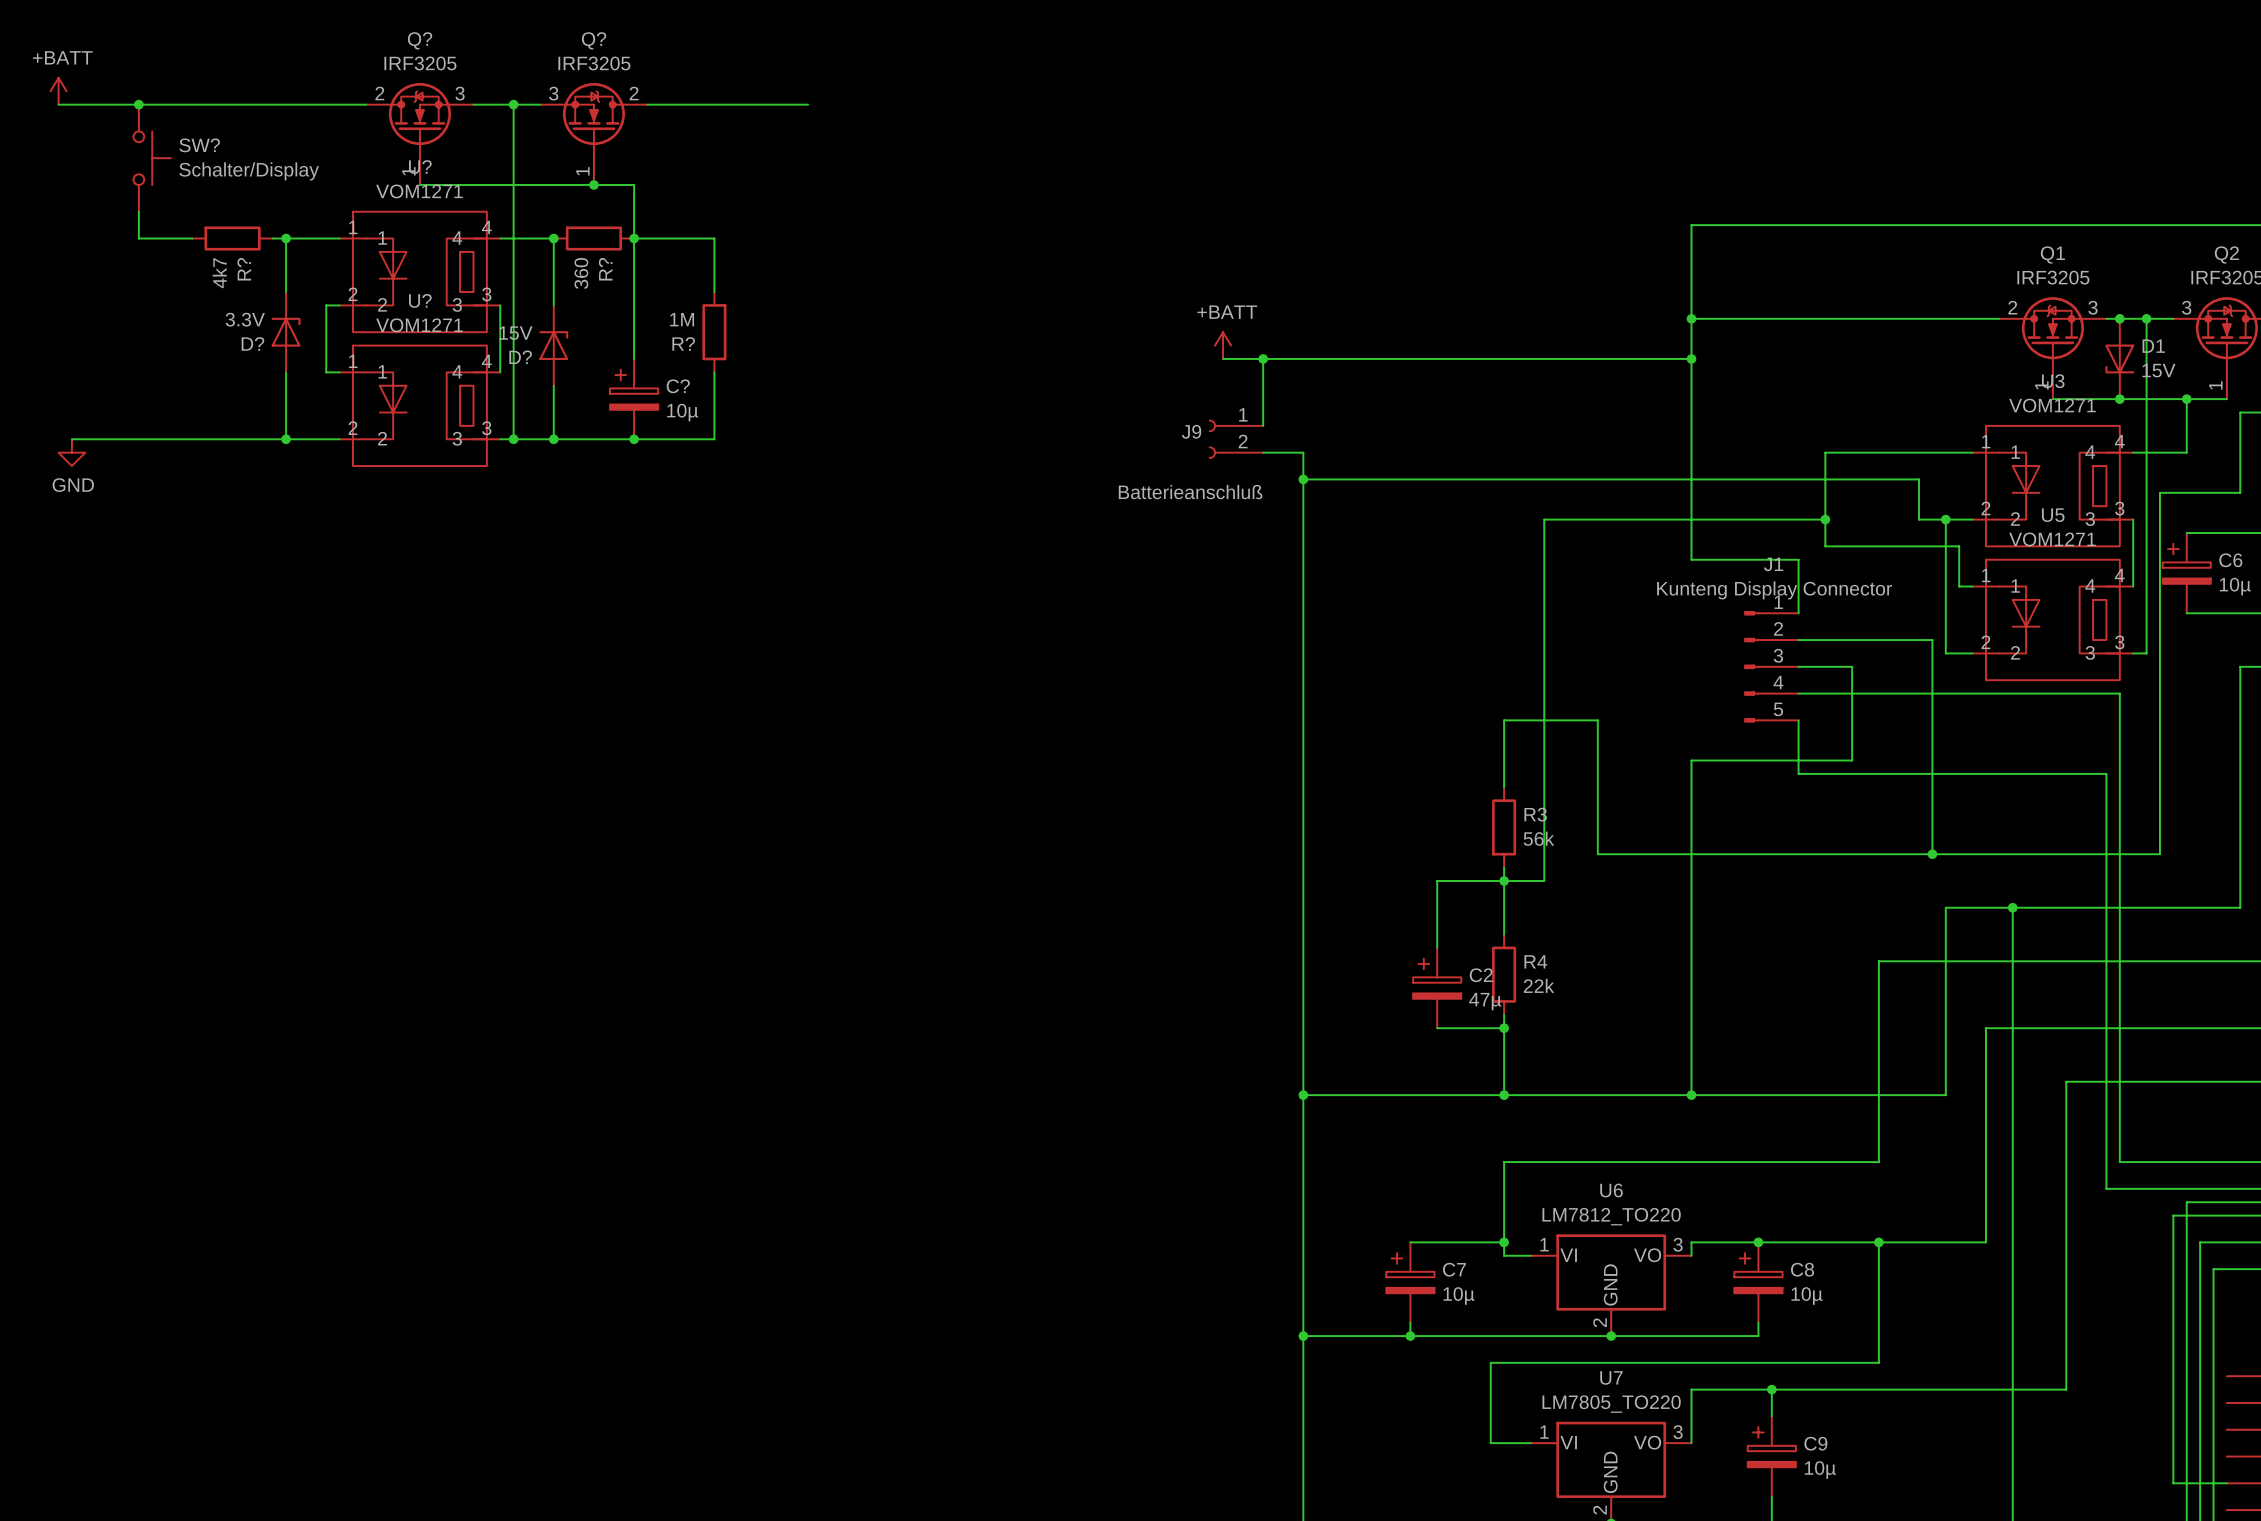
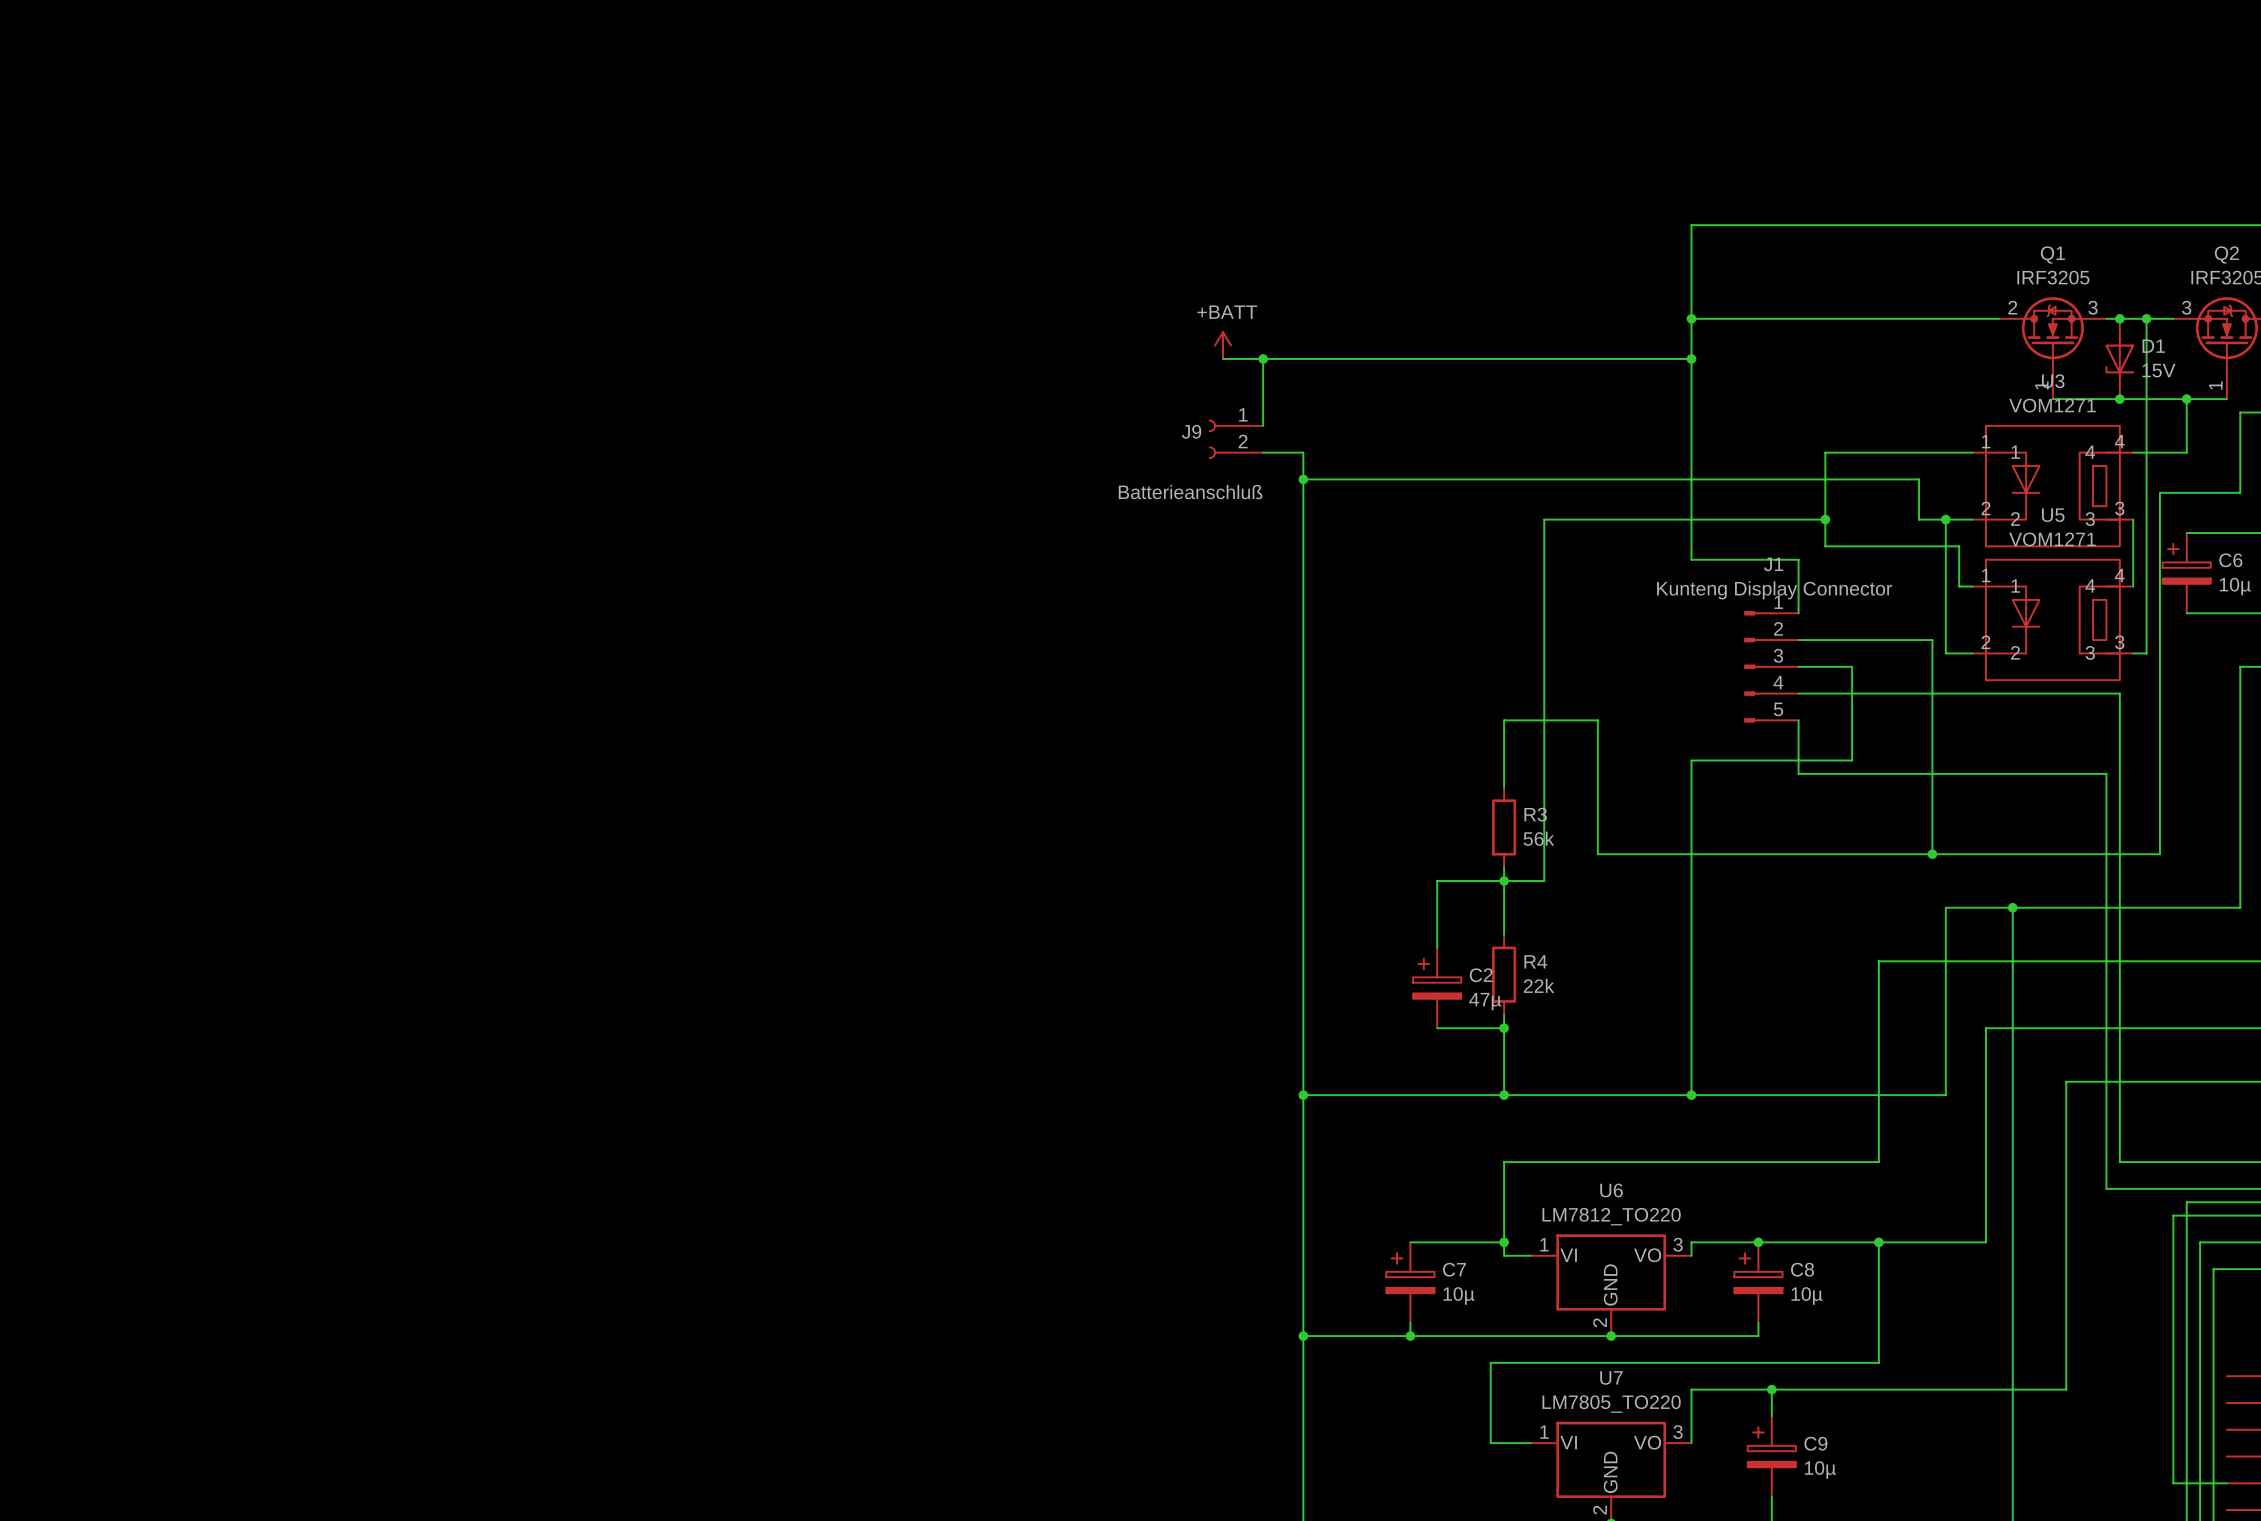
power symbol: +BATT (58, 91) -> none
wire: (58, 104) (366, 104) -> none
junction: (138, 104) -> none
wire: (473, 104) (540, 104) -> none
wire: (513, 104) (513, 439) -> none
junction: (513, 104) -> none
wire: (647, 104) (808, 104) -> none
Q?: IRF3205 (419, 133) -> none
Q?: IRF3205 (593, 133) -> none
SW?: Schalter/Display (152, 158) -> none
wire: (419, 184) (634, 184) (634, 358) -> none
junction: (593, 184) -> none
wire: (138, 211) (138, 238) (192, 238) -> none
R?: 4k7 (232, 238) -> none
wire: (272, 238) (339, 238) -> none
wire: (286, 238) (286, 292) -> none
junction: (286, 238) -> none
wire: (500, 238) (553, 238) (553, 305) -> none
junction: (553, 238) -> none
R?: 360 (593, 238) -> none
wire: (634, 238) (714, 238) (714, 292) -> none
junction: (634, 238) -> none
U?: VOM1271 (419, 271) -> none
wire: (339, 305) (326, 305) (326, 372) (339, 372) -> none
wire: (500, 305) (500, 372) -> none
D?: 3.3V (286, 332) -> none
R?: 1M (714, 332) -> none
D?: 15V (553, 345) -> none
wire: (286, 372) (286, 439) -> none
wire: (714, 372) (714, 439) (500, 439) -> none
wire: (553, 385) (553, 439) -> none
C?: 10µ (634, 399) -> none
U?: VOM1271 (419, 405) -> none
wire: (71, 439) (339, 439) -> none
junction: (286, 439) -> none
junction: (513, 439) -> none
junction: (553, 439) -> none
junction: (634, 439) -> none
power symbol: GND (71, 452) -> none

